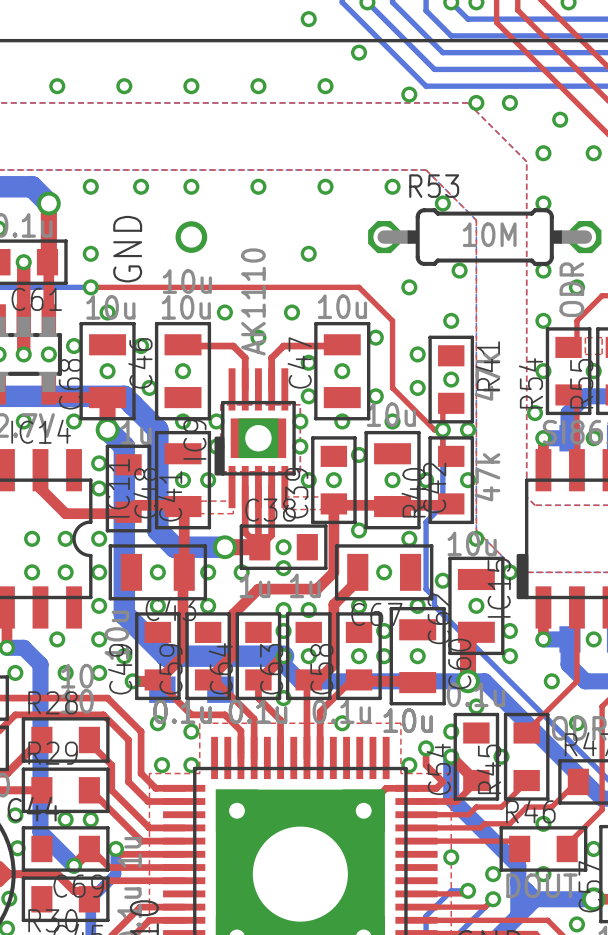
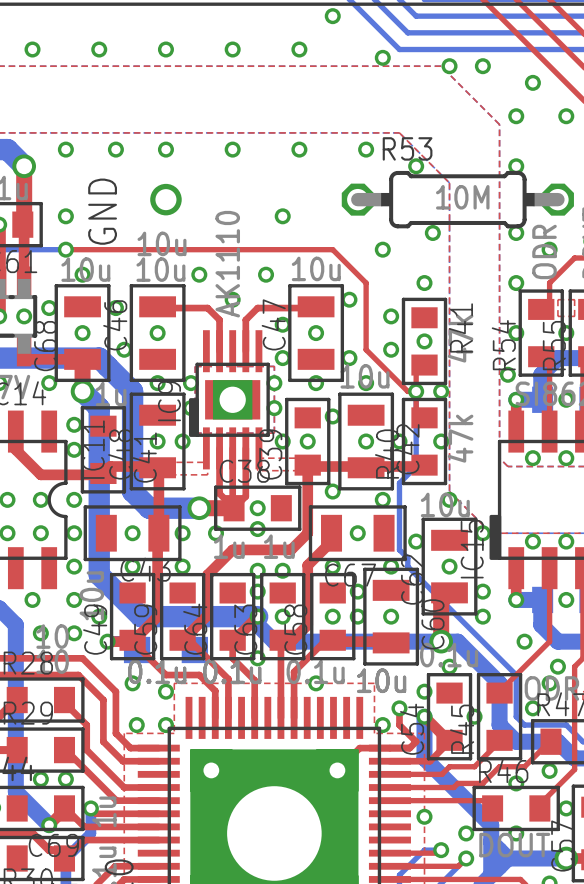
via: none -> (532, 458)
via: none -> (566, 458)
via: none -> (532, 541)
via: none -> (566, 541)
via: none -> (557, 666)
bottom track: (543, 714) (593, 765) -> (516, 675) (516, 716) (524, 725) (566, 725)
bottom track: (526, 723) (585, 781) -> (499, 683) (499, 725) (516, 741) (557, 741)
via: none -> (532, 708)
via: none -> (549, 770)

